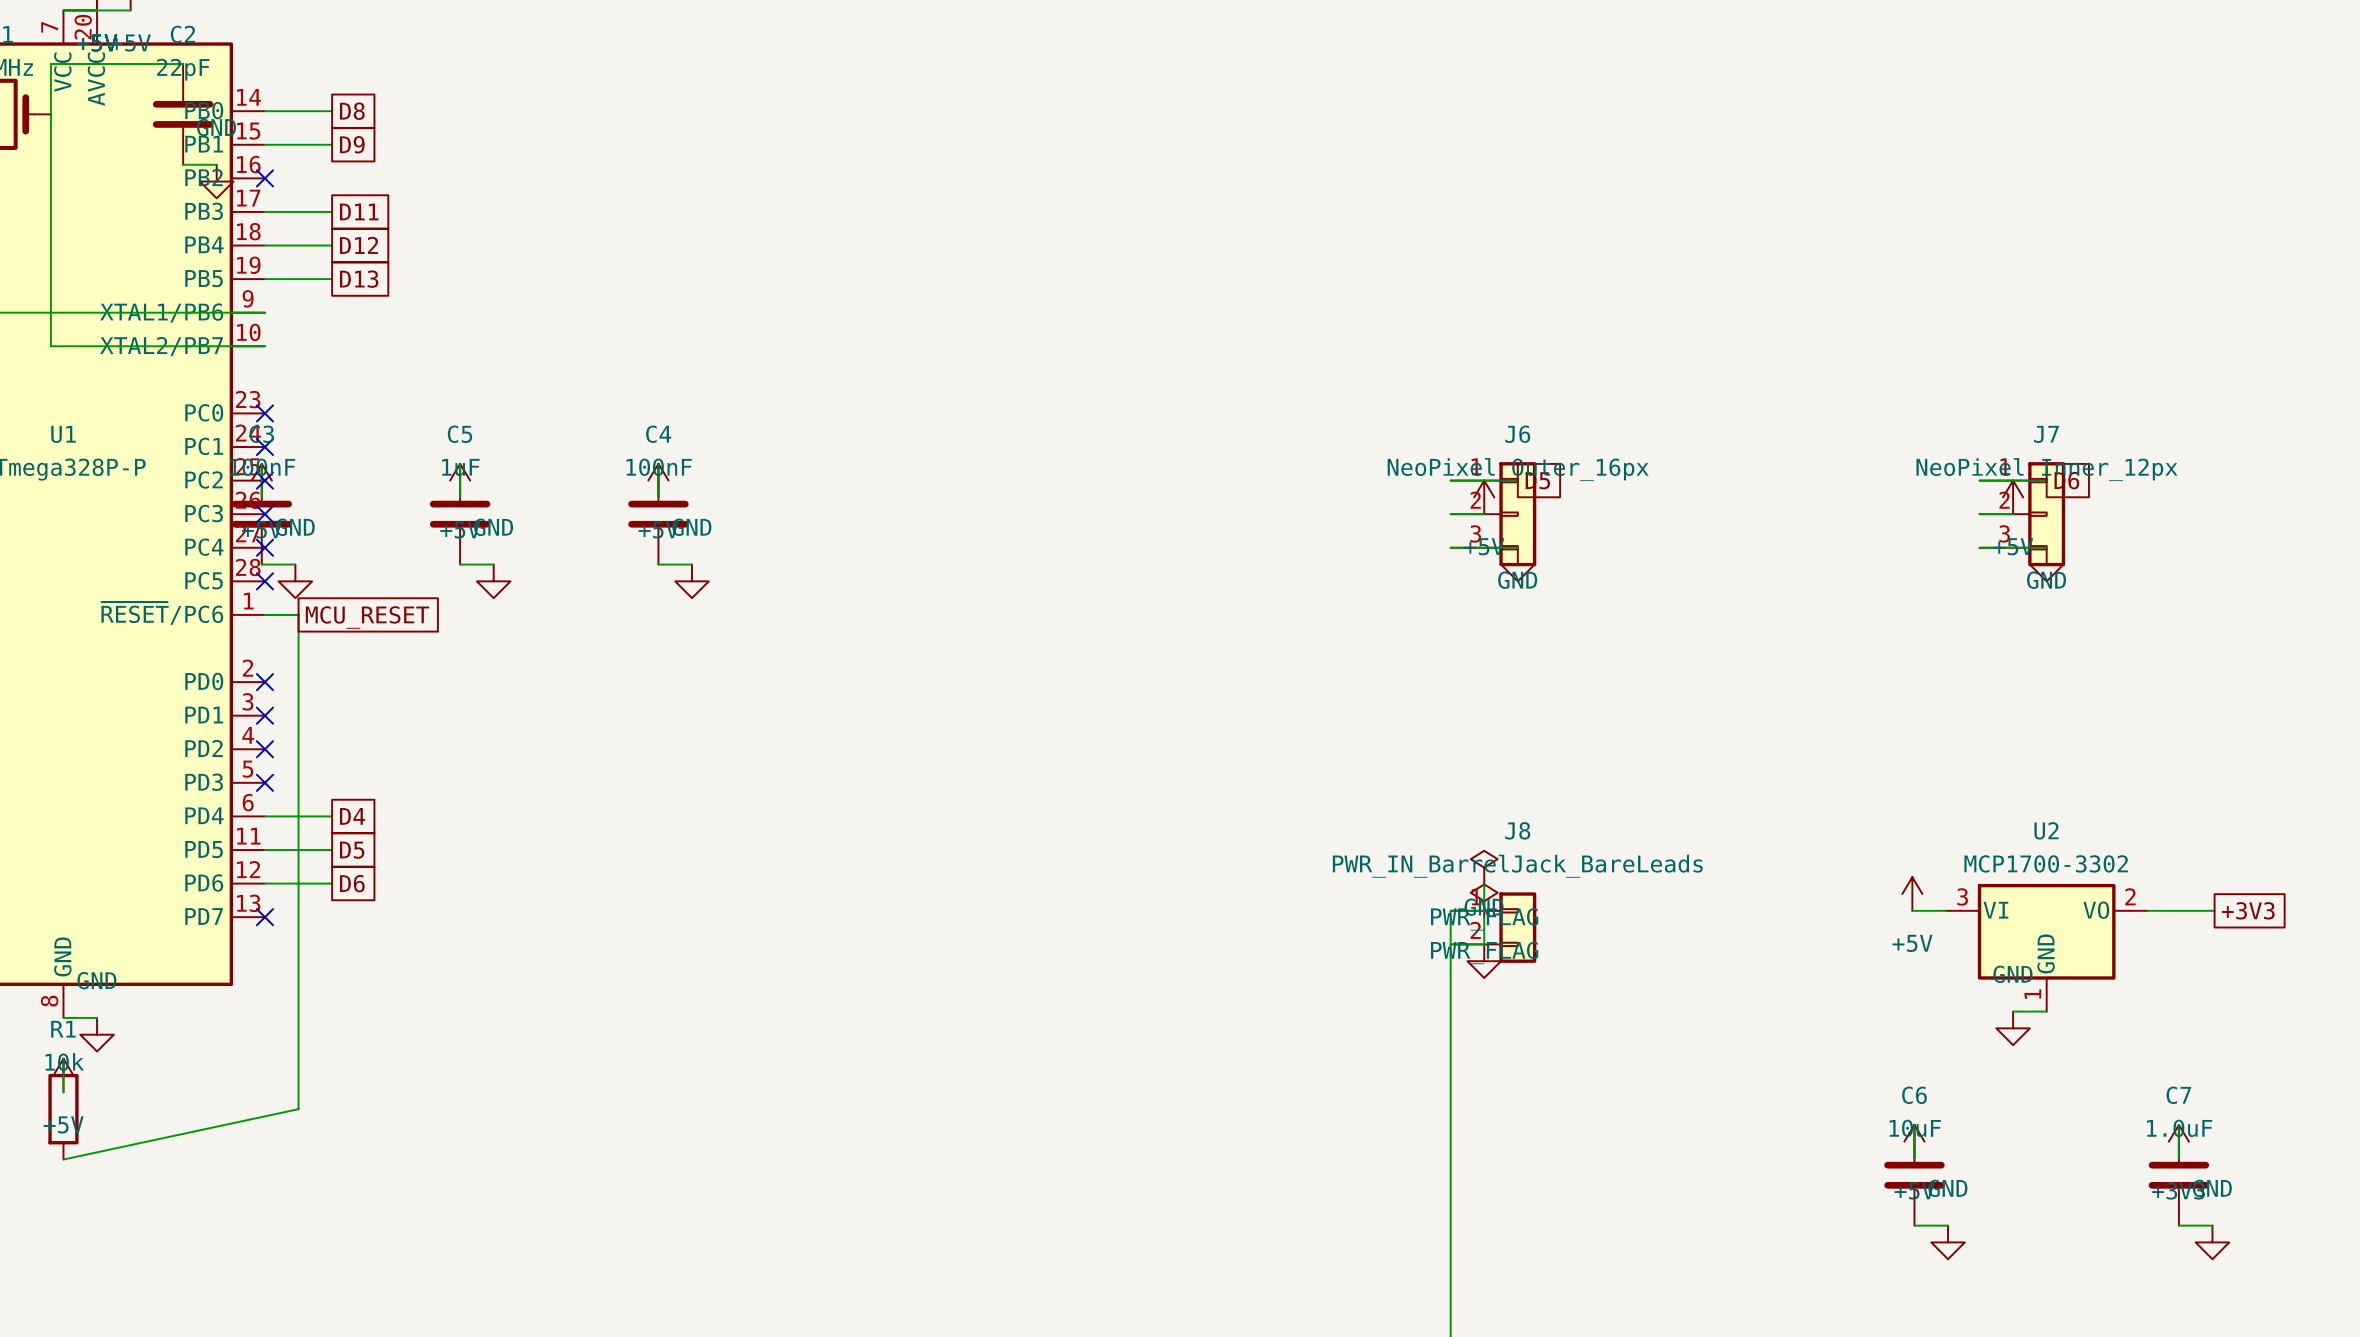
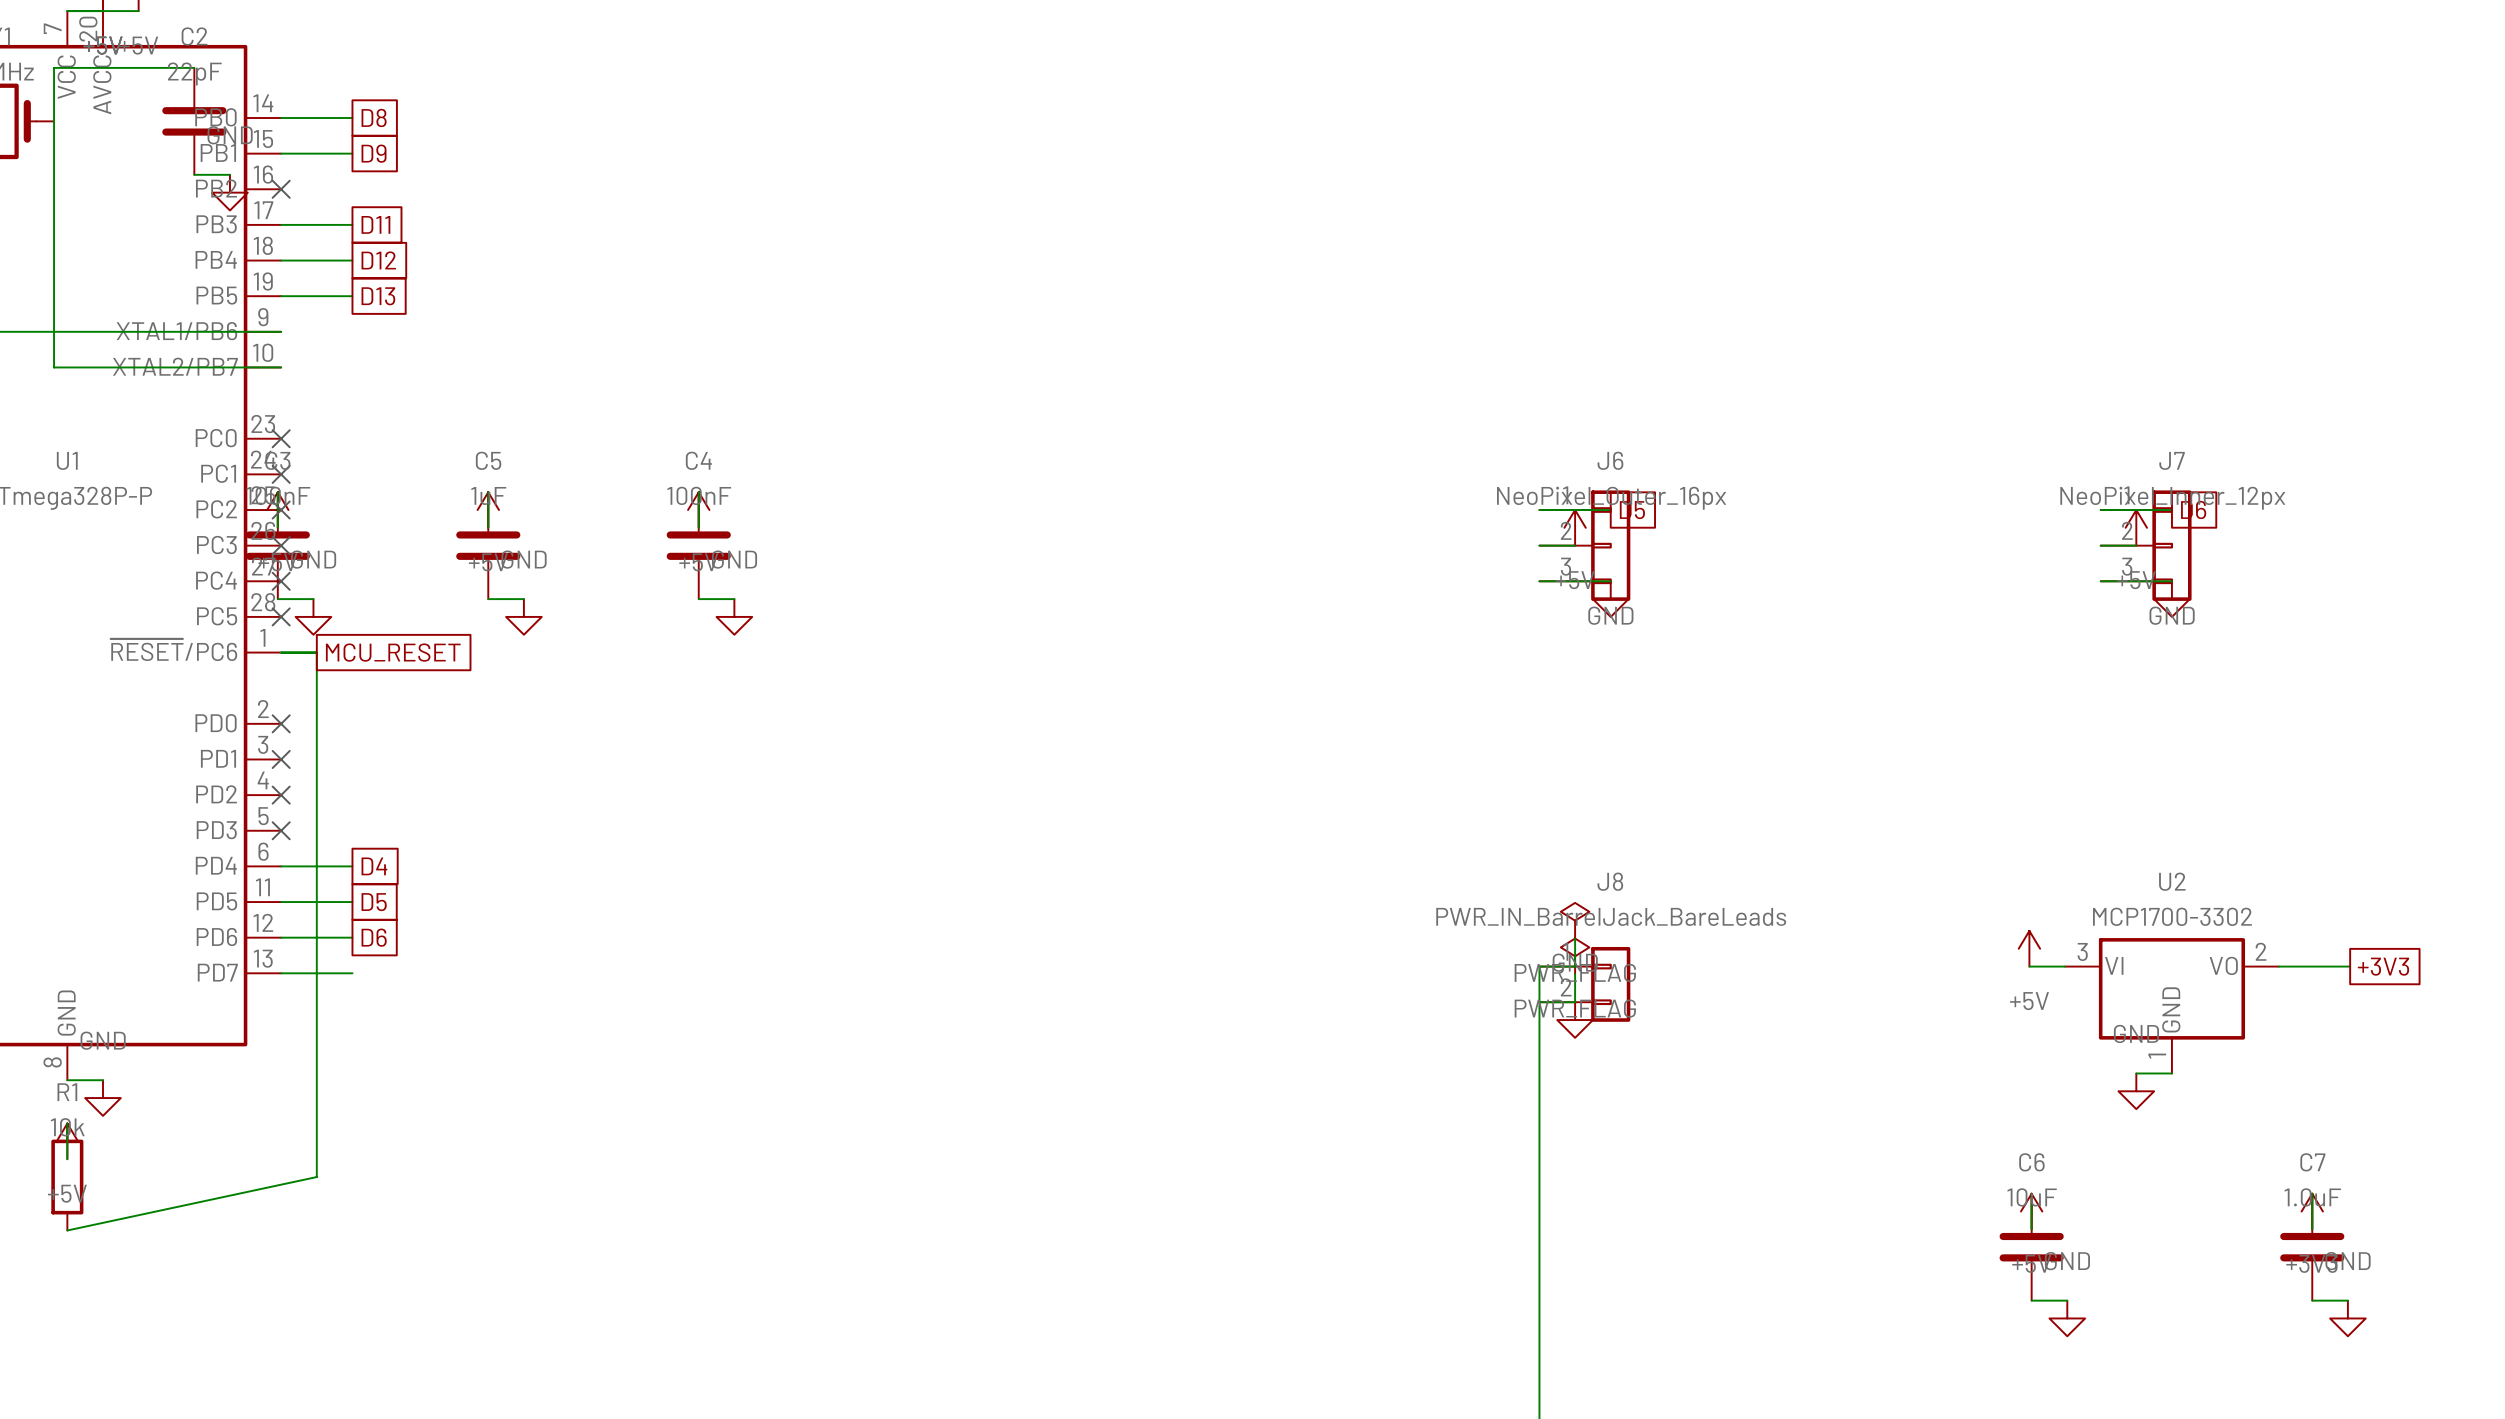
wire: none -> (281, 973) (352, 973)
no-connect mark: (264, 917) -> none

